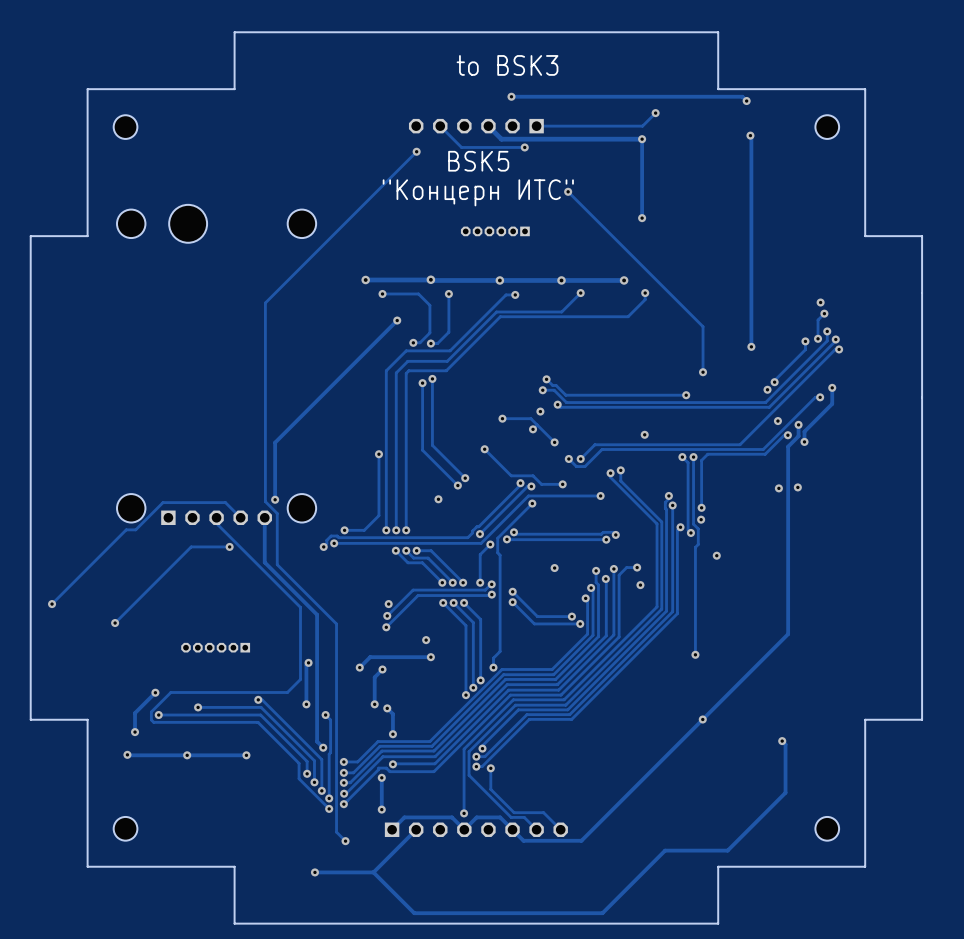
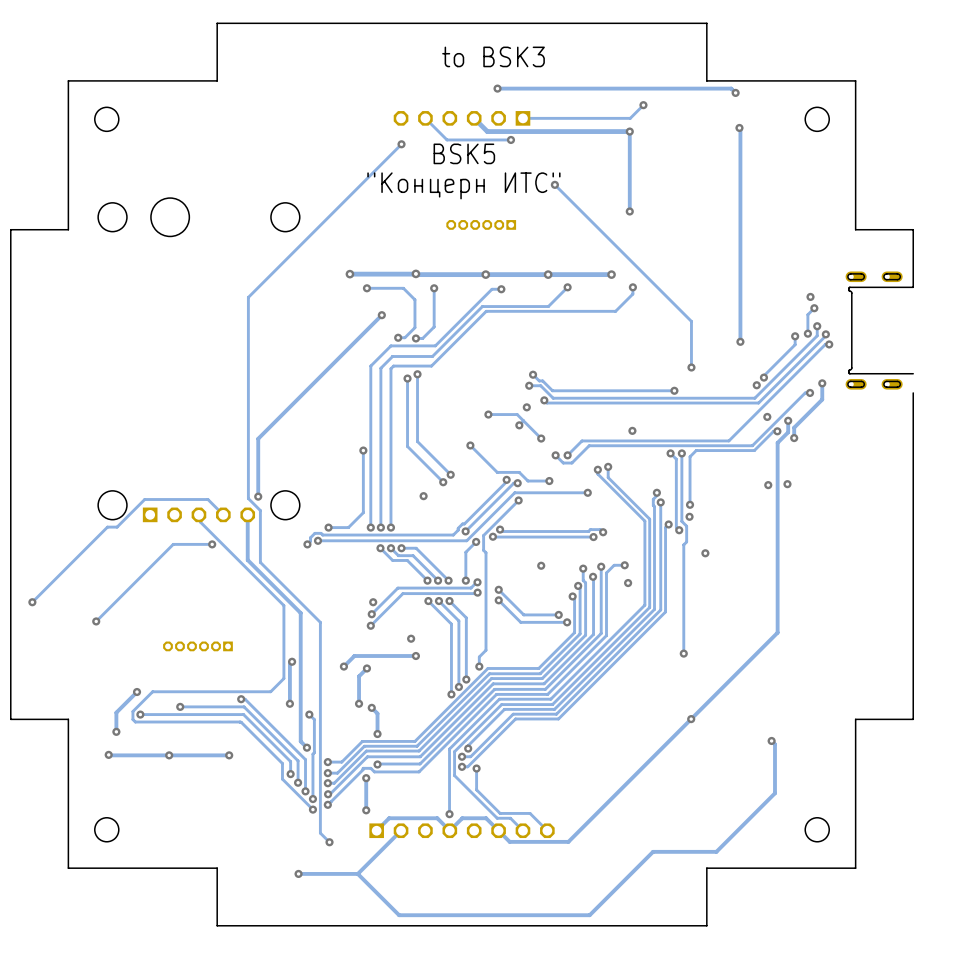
board edge: (922, 293) (922, 397) -> none
part: none -> (879, 330)

